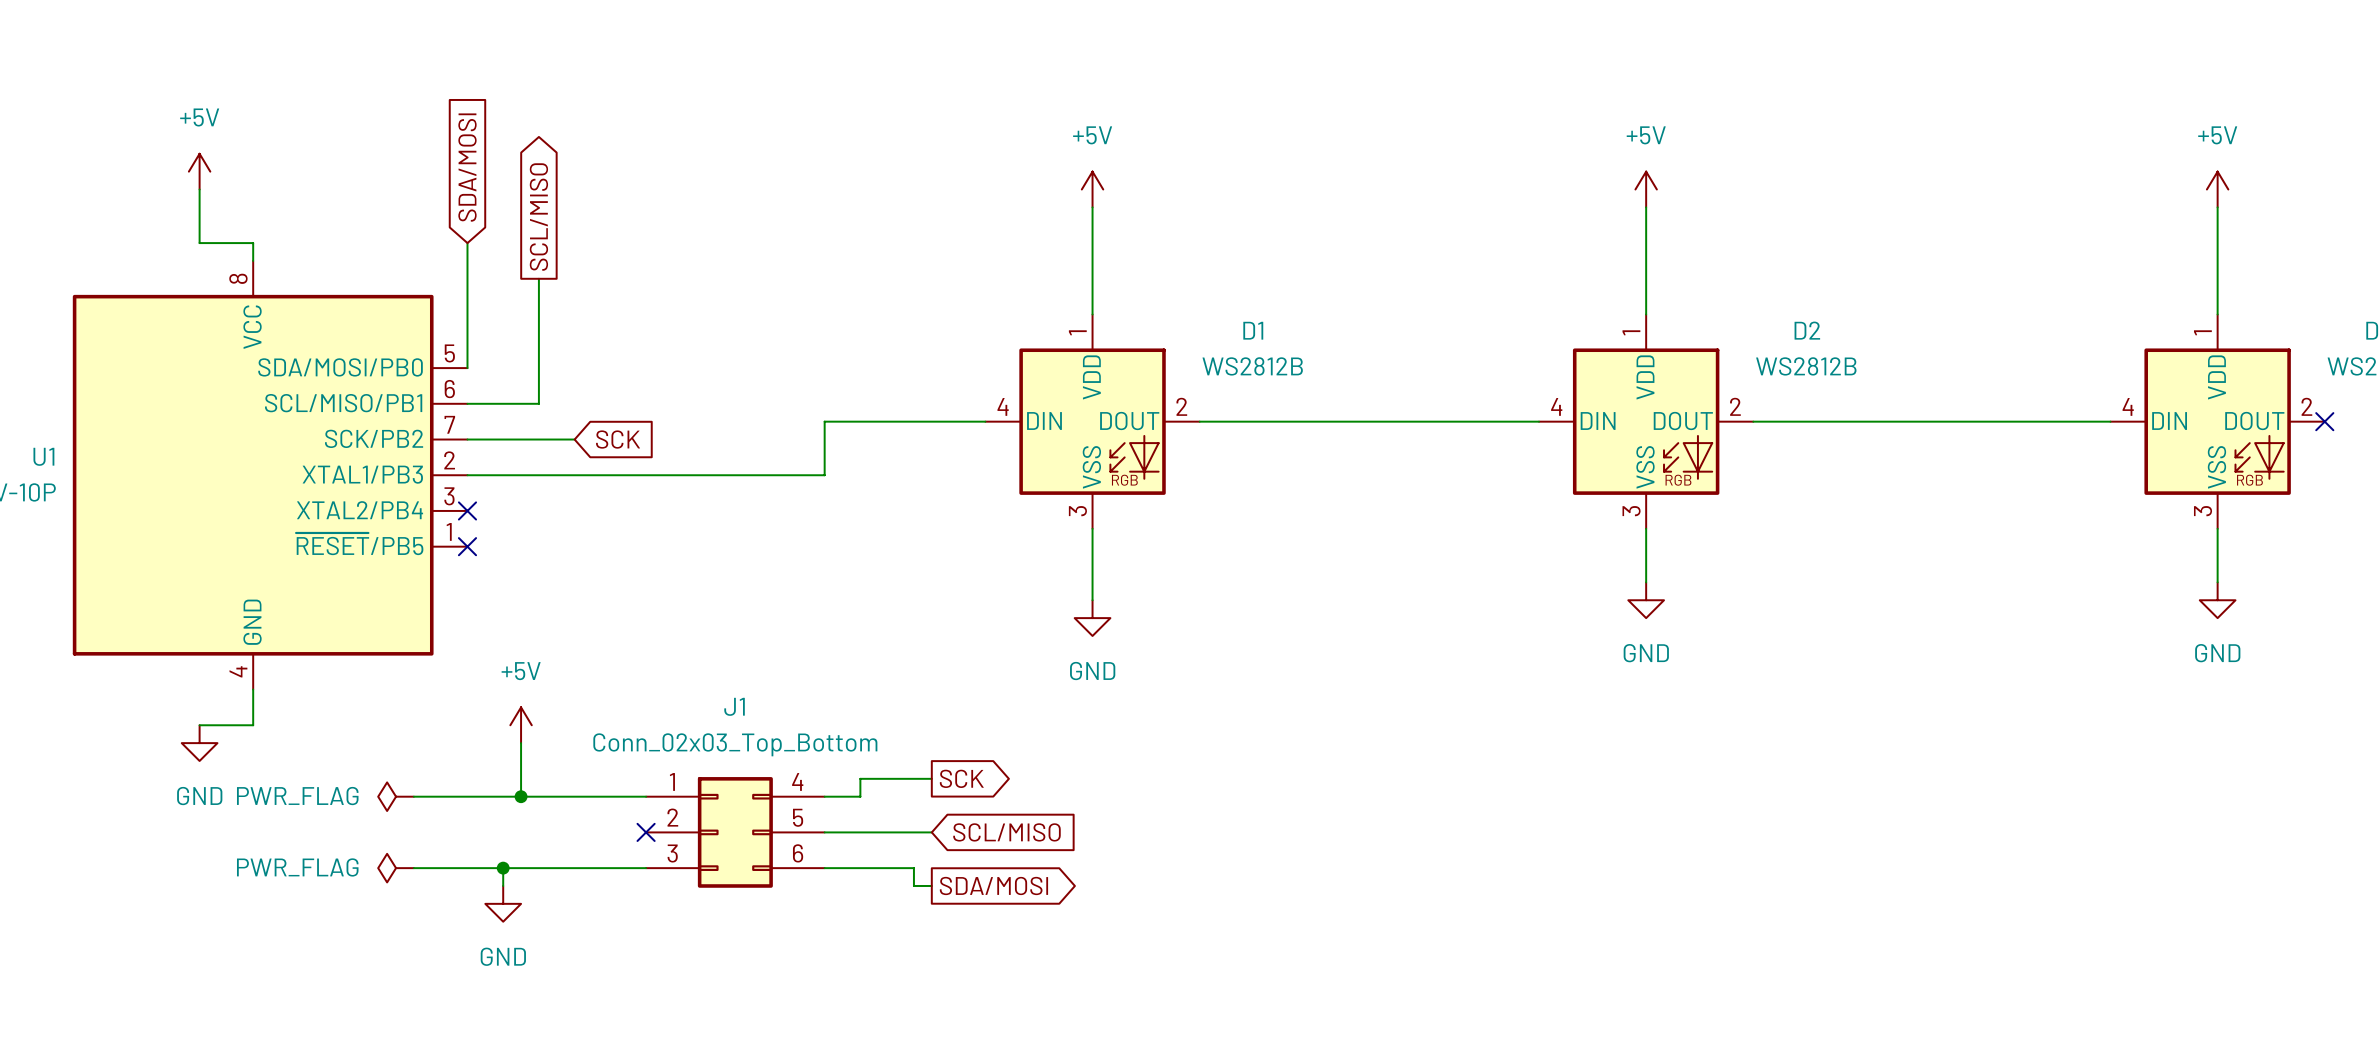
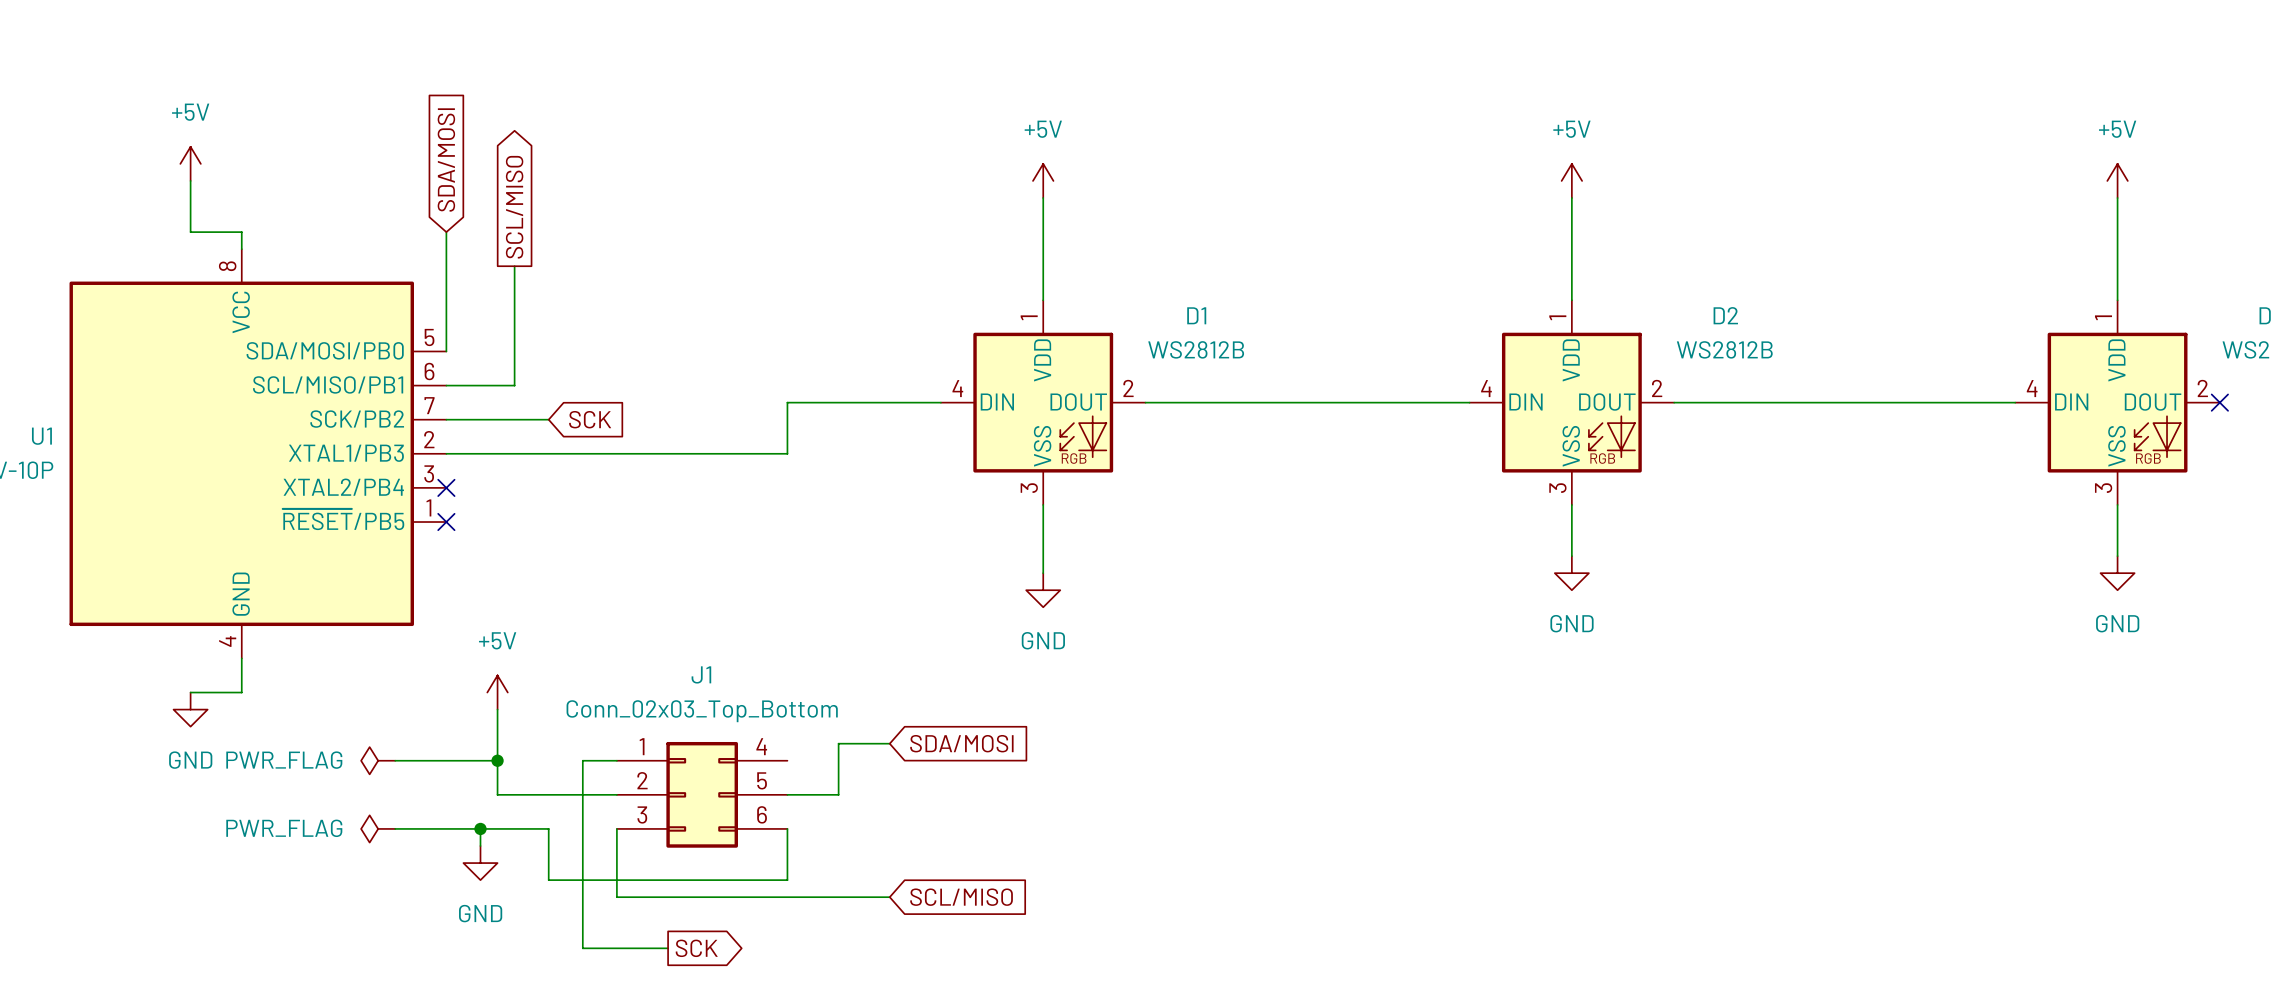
wire: (878, 778) (860, 778) (860, 796) (824, 796) -> (838, 743) (838, 794)
global label shape: output (961, 778) -> input (961, 743)
global label: SCK (961, 778) -> SDA/MOSI (961, 743)
wire: (521, 796) (610, 796) -> (497, 760) (497, 794) (616, 794)
wire: none -> (582, 760) (582, 948) (668, 948)
no-connect mark: (646, 832) -> none
wire: (878, 832) (931, 832) -> none
global label position: SCL/MISO (1006, 832) -> SCL/MISO (961, 897)
wire: (574, 868) (646, 868) -> (548, 828) (548, 880) (787, 880) (787, 828)
wire: none -> (616, 828) (616, 897) (889, 897)
wire: (824, 868) (913, 868) (913, 885) (931, 885) -> none
global label: SDA/MOSI (993, 885) -> none
global label: none -> SCK (696, 948)

